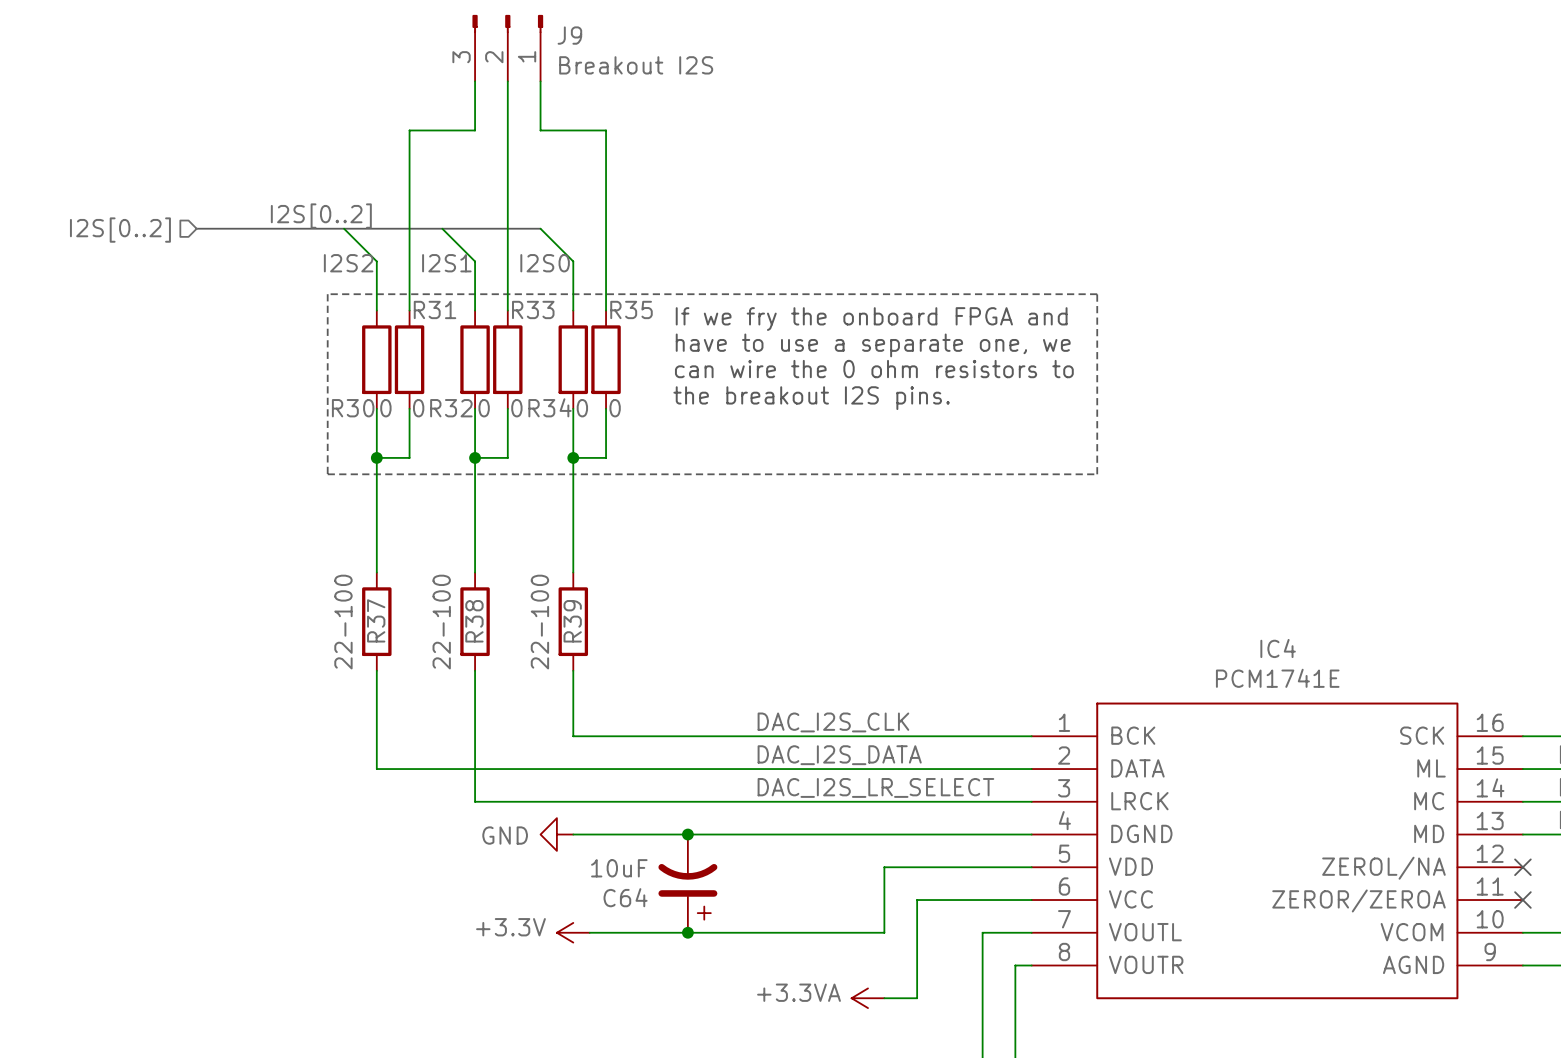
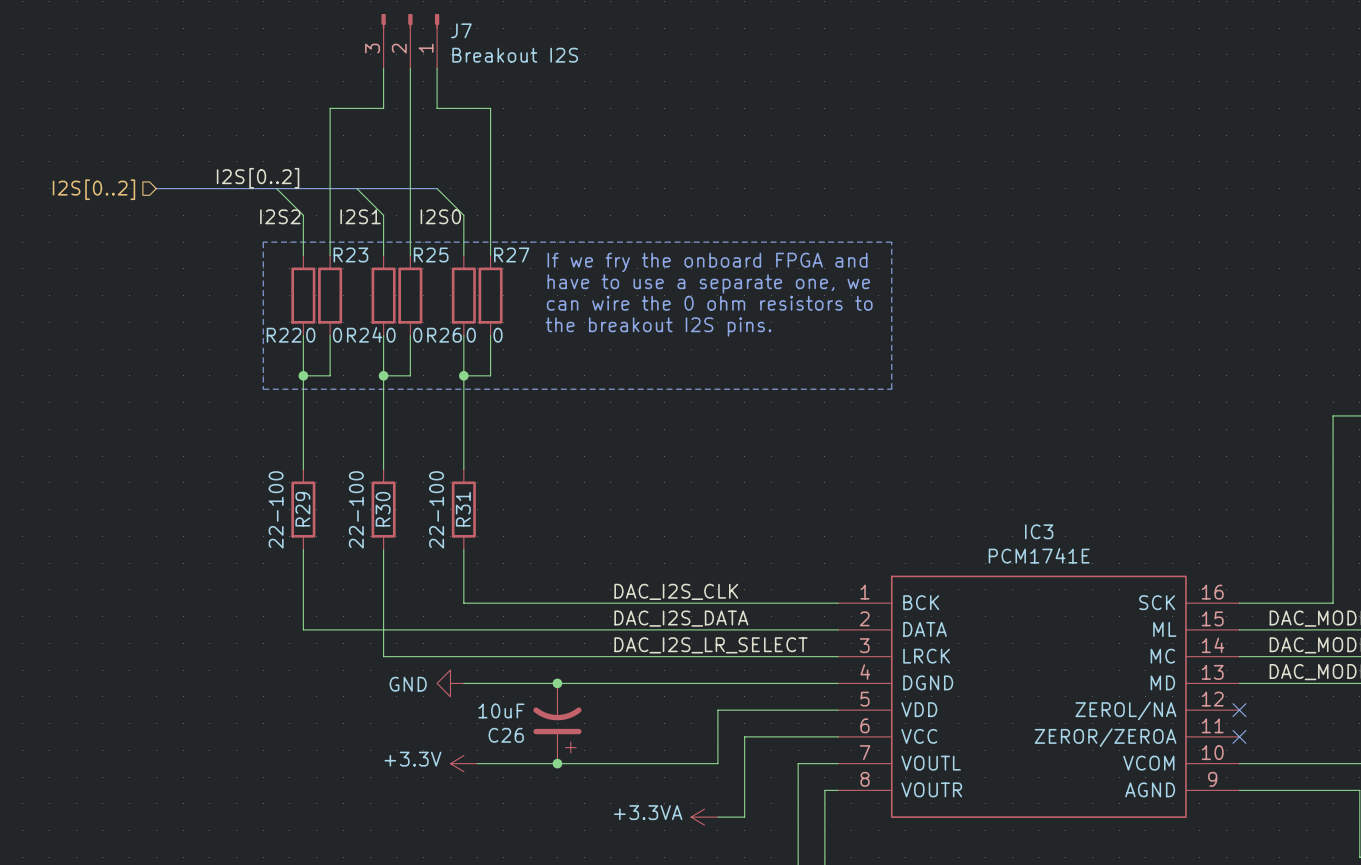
J9 name: J9 (569, 35) -> J7 (461, 30)
R31 name: R31 (435, 309) -> R23 (350, 254)
R33 name: R33 (533, 309) -> R25 (431, 254)
R35 name: R35 (631, 309) -> R27 (511, 254)
R34 name: R34 (550, 407) -> R26 (444, 335)
R30 name: R30 (353, 408) -> R22 (284, 335)
R32 name: R32 (451, 408) -> R24 (364, 334)
R37 name: R37 (376, 620) -> R29 (302, 509)
R38 name: R38 (474, 621) -> R30 (383, 509)
R39 name: R39 (572, 621) -> R31 (463, 509)
IC4 name: IC4 (1278, 648) -> IC3 (1039, 531)
C64 name: C64 (625, 897) -> C26 (506, 735)

